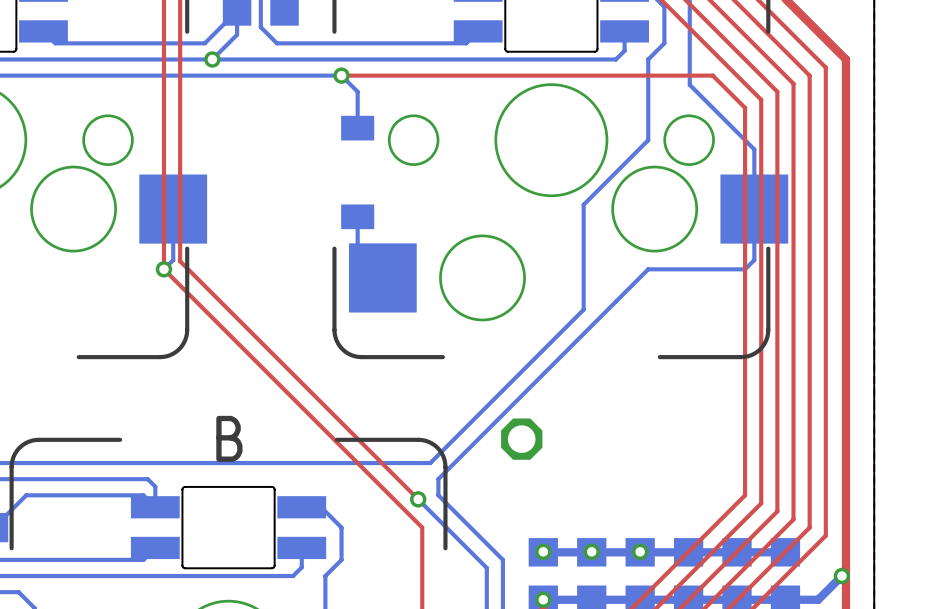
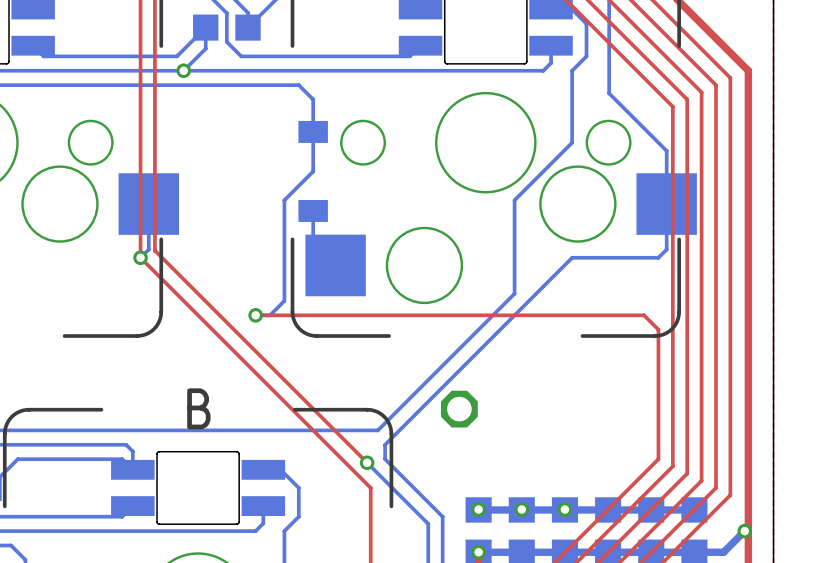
top track: (341, 75) (712, 75) (745, 107) (745, 350) -> (255, 315) (644, 315) (658, 329)
via: (341, 75) -> none
bottom track: none -> (313, 131) (313, 171) (284, 200) (284, 300) (270, 315) (255, 315)
via: none -> (255, 315)

